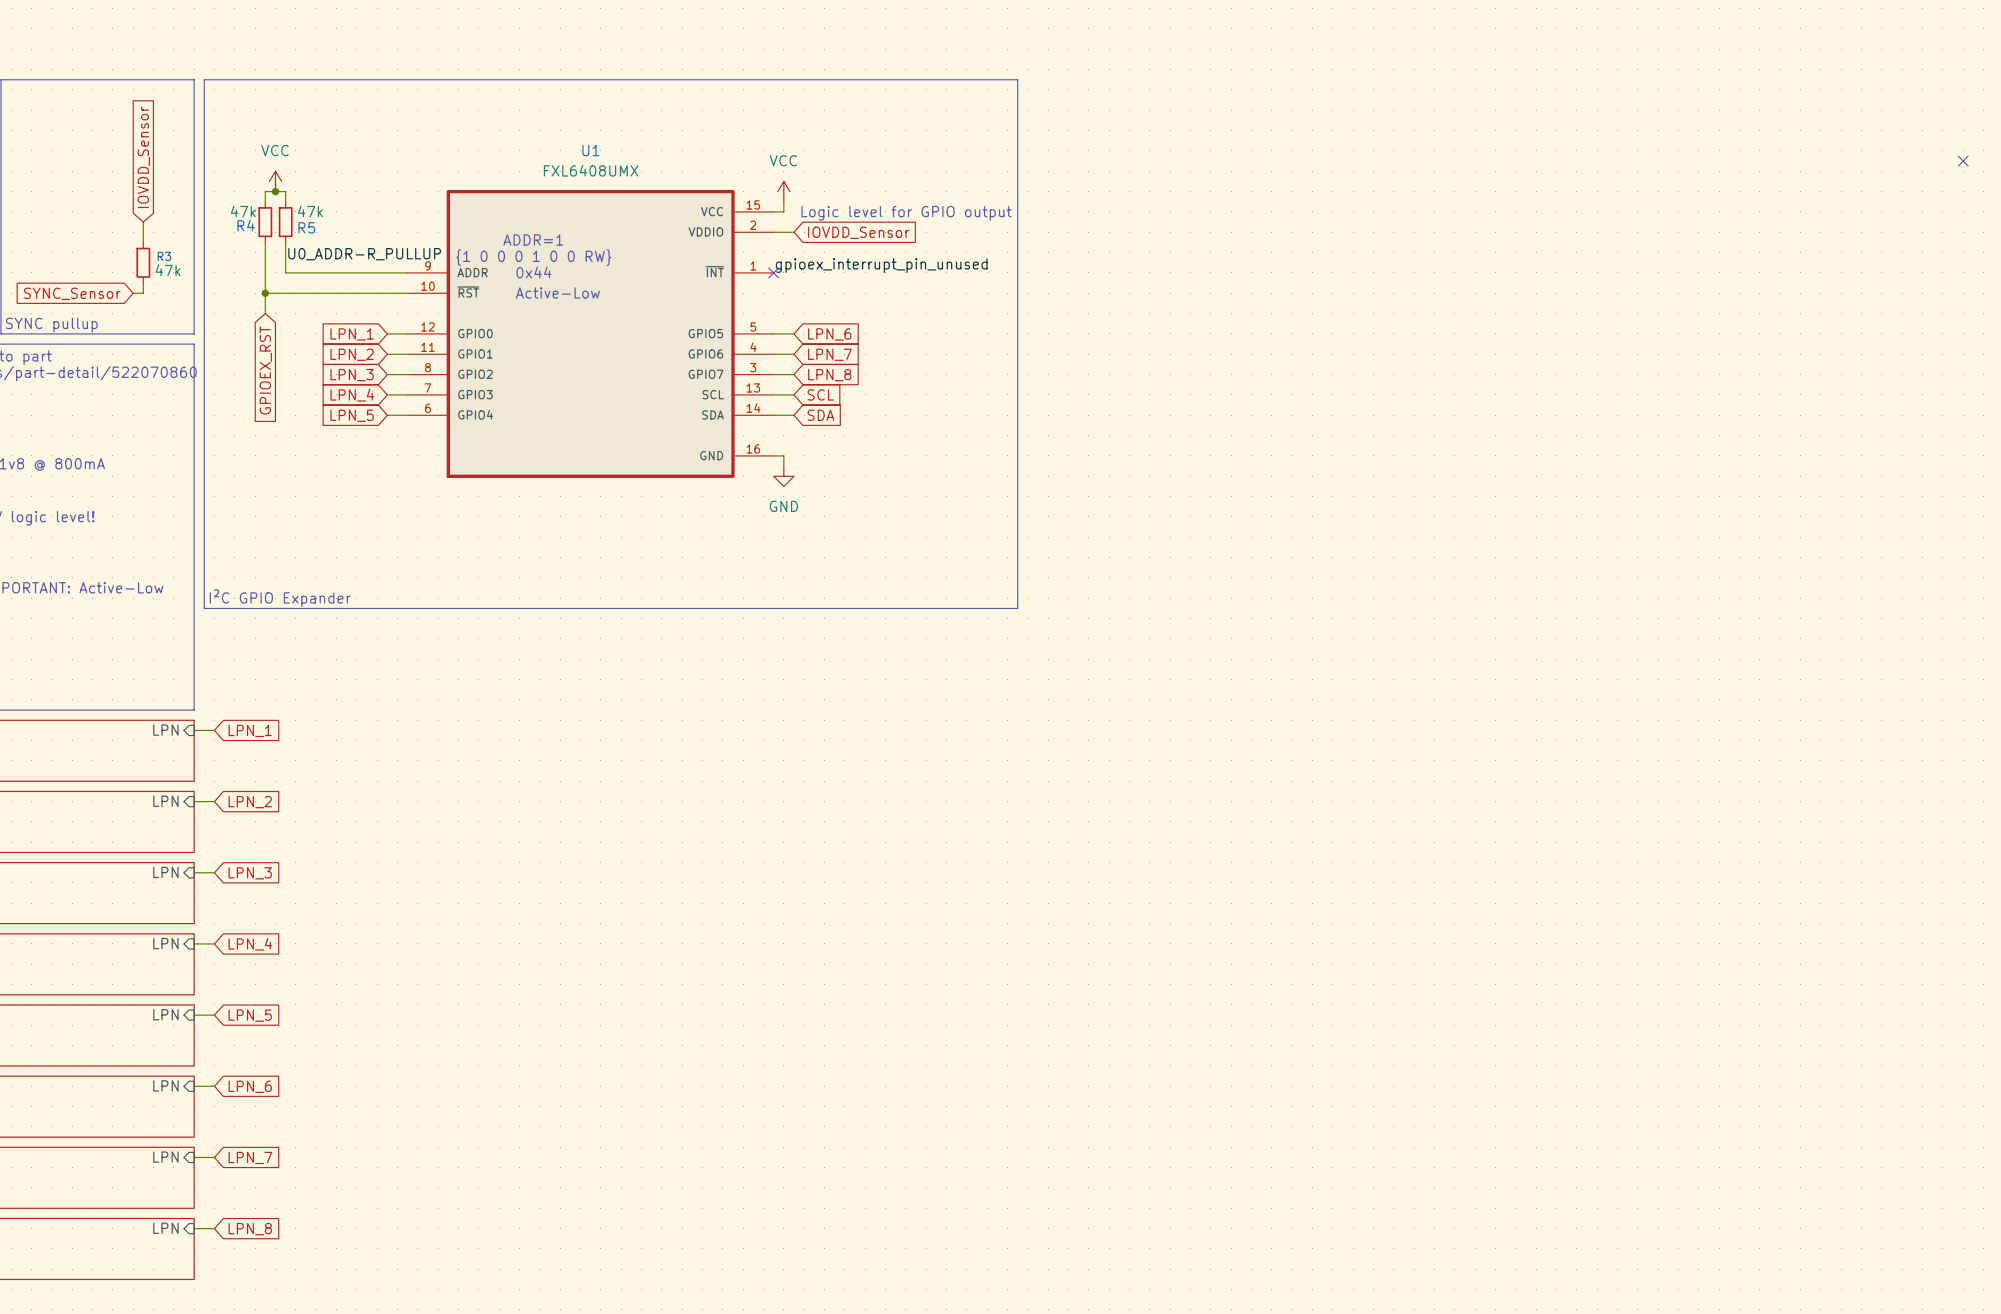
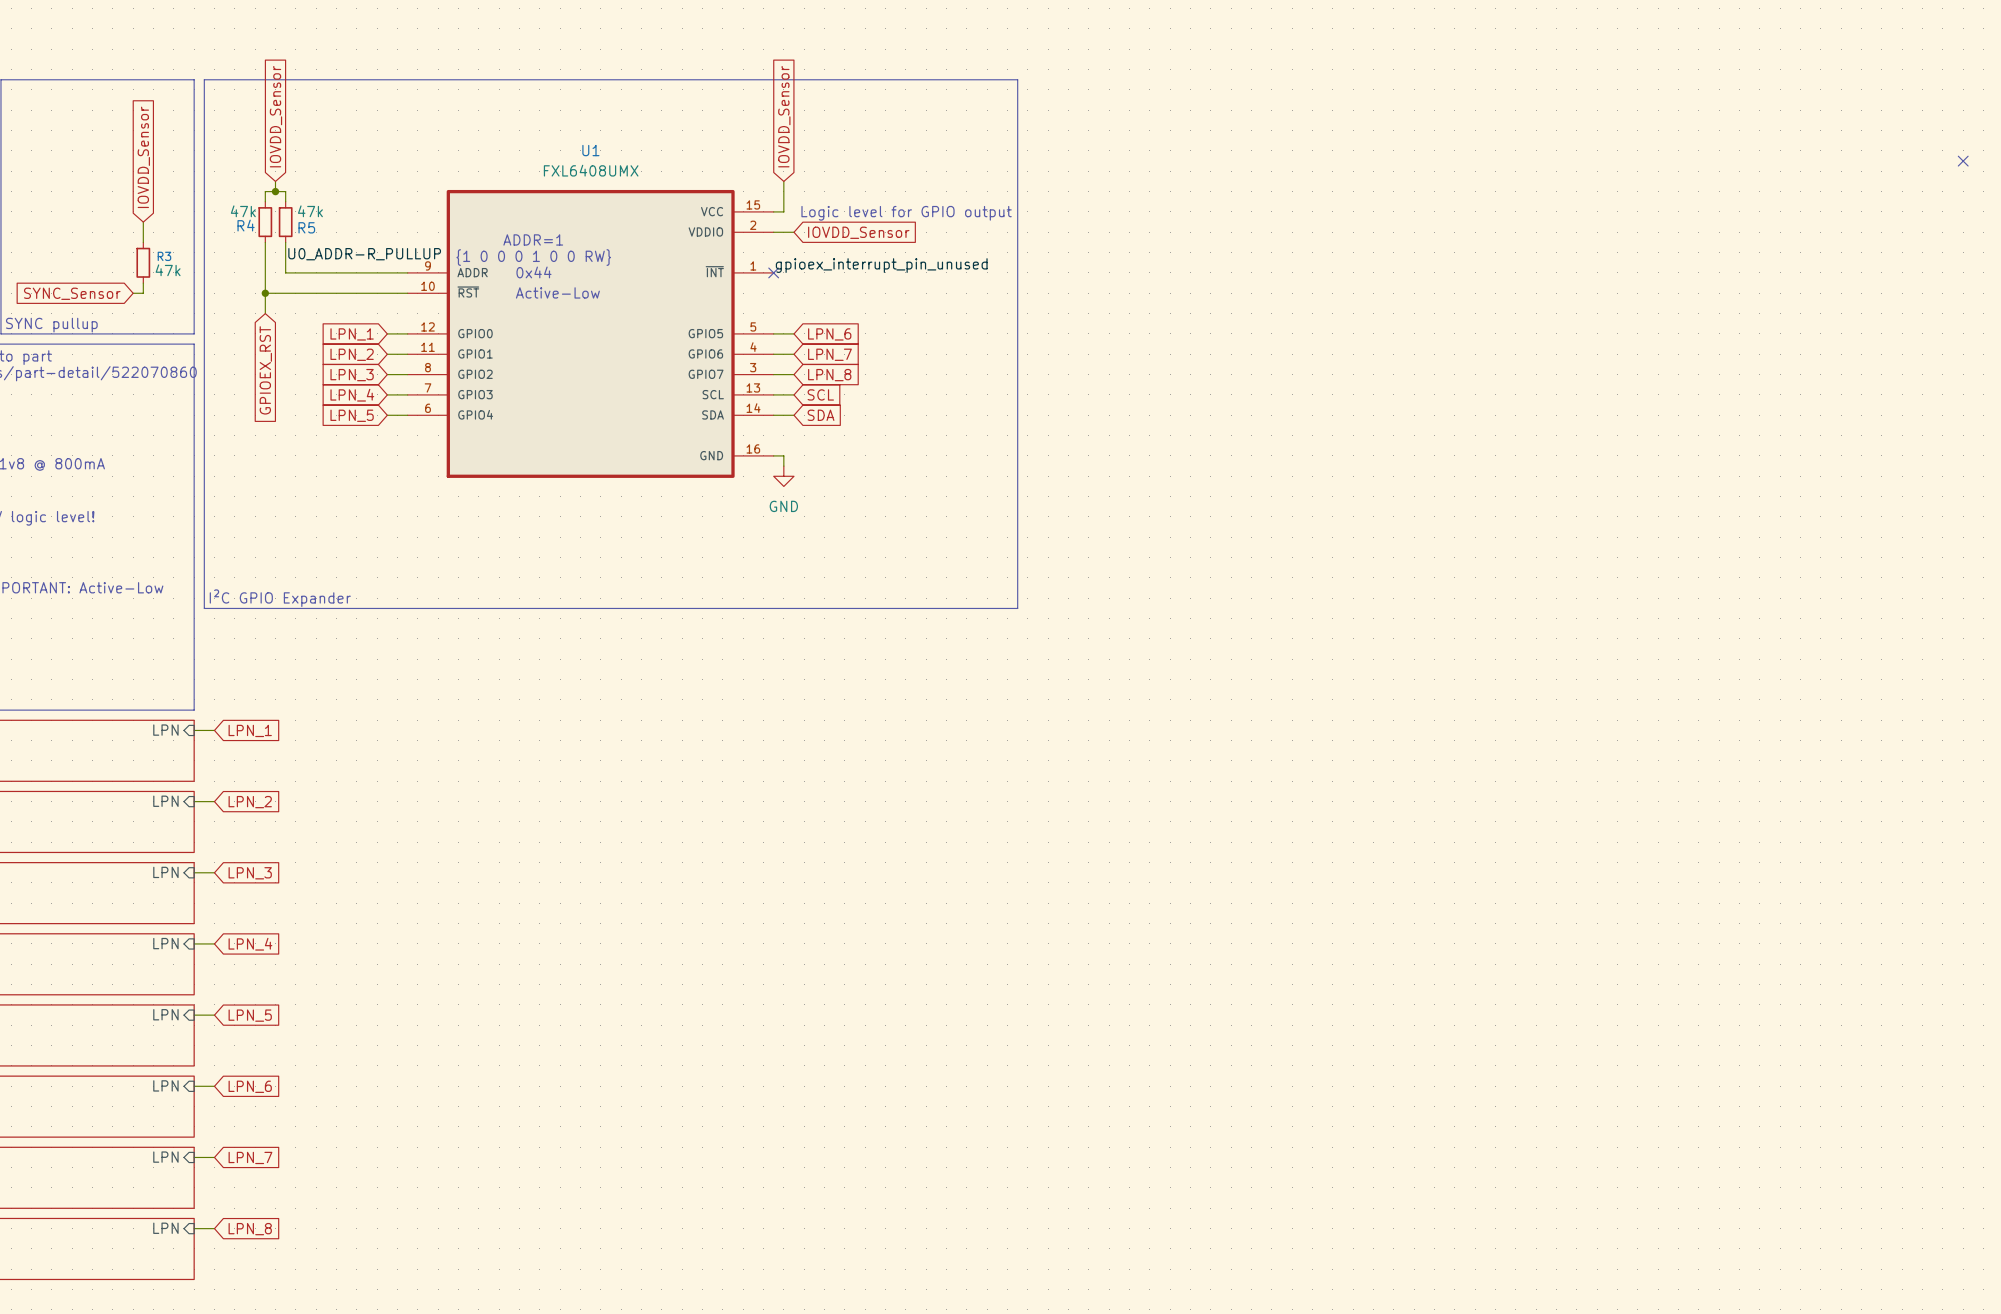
global label: none -> IOVDD_Sensor (275, 116)
global label: none -> IOVDD_Sensor (784, 116)
power symbol: VCC (275, 181) -> none
power symbol: VCC (783, 191) -> none

